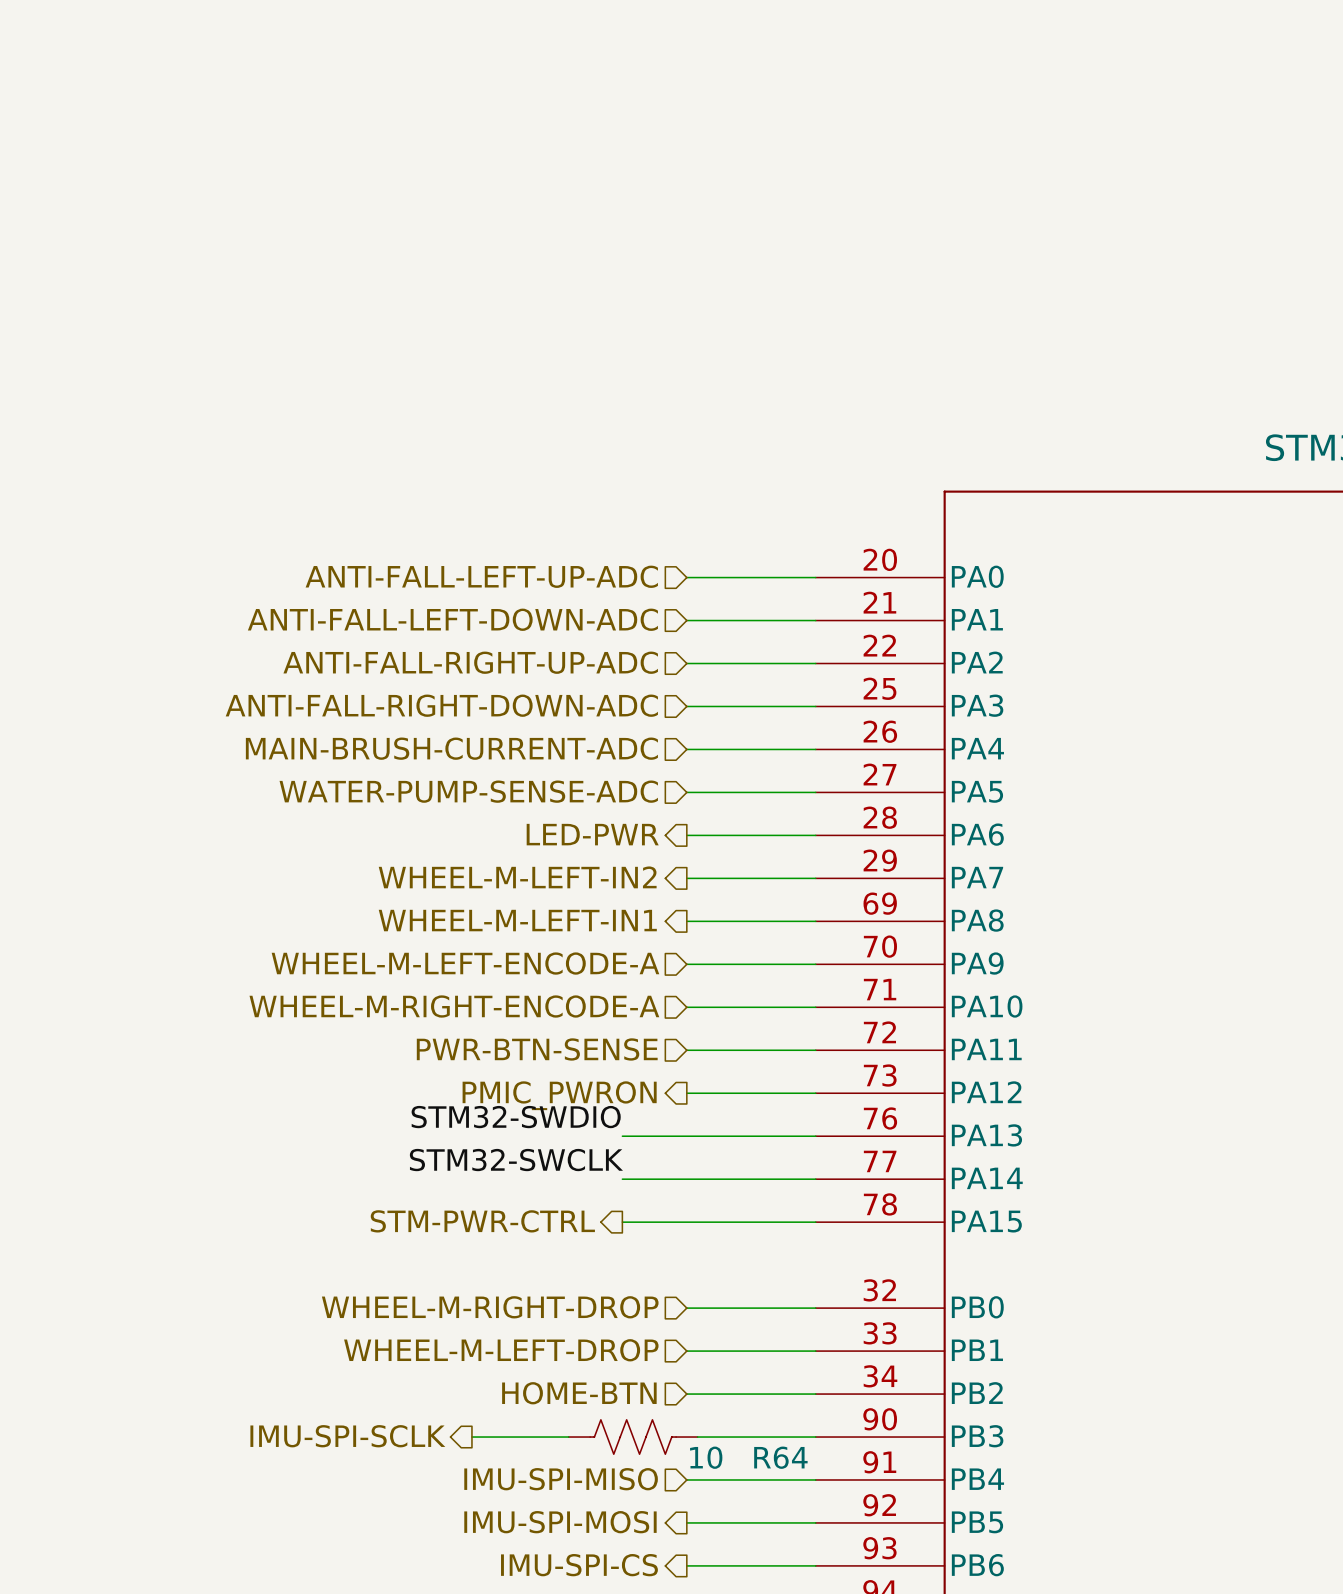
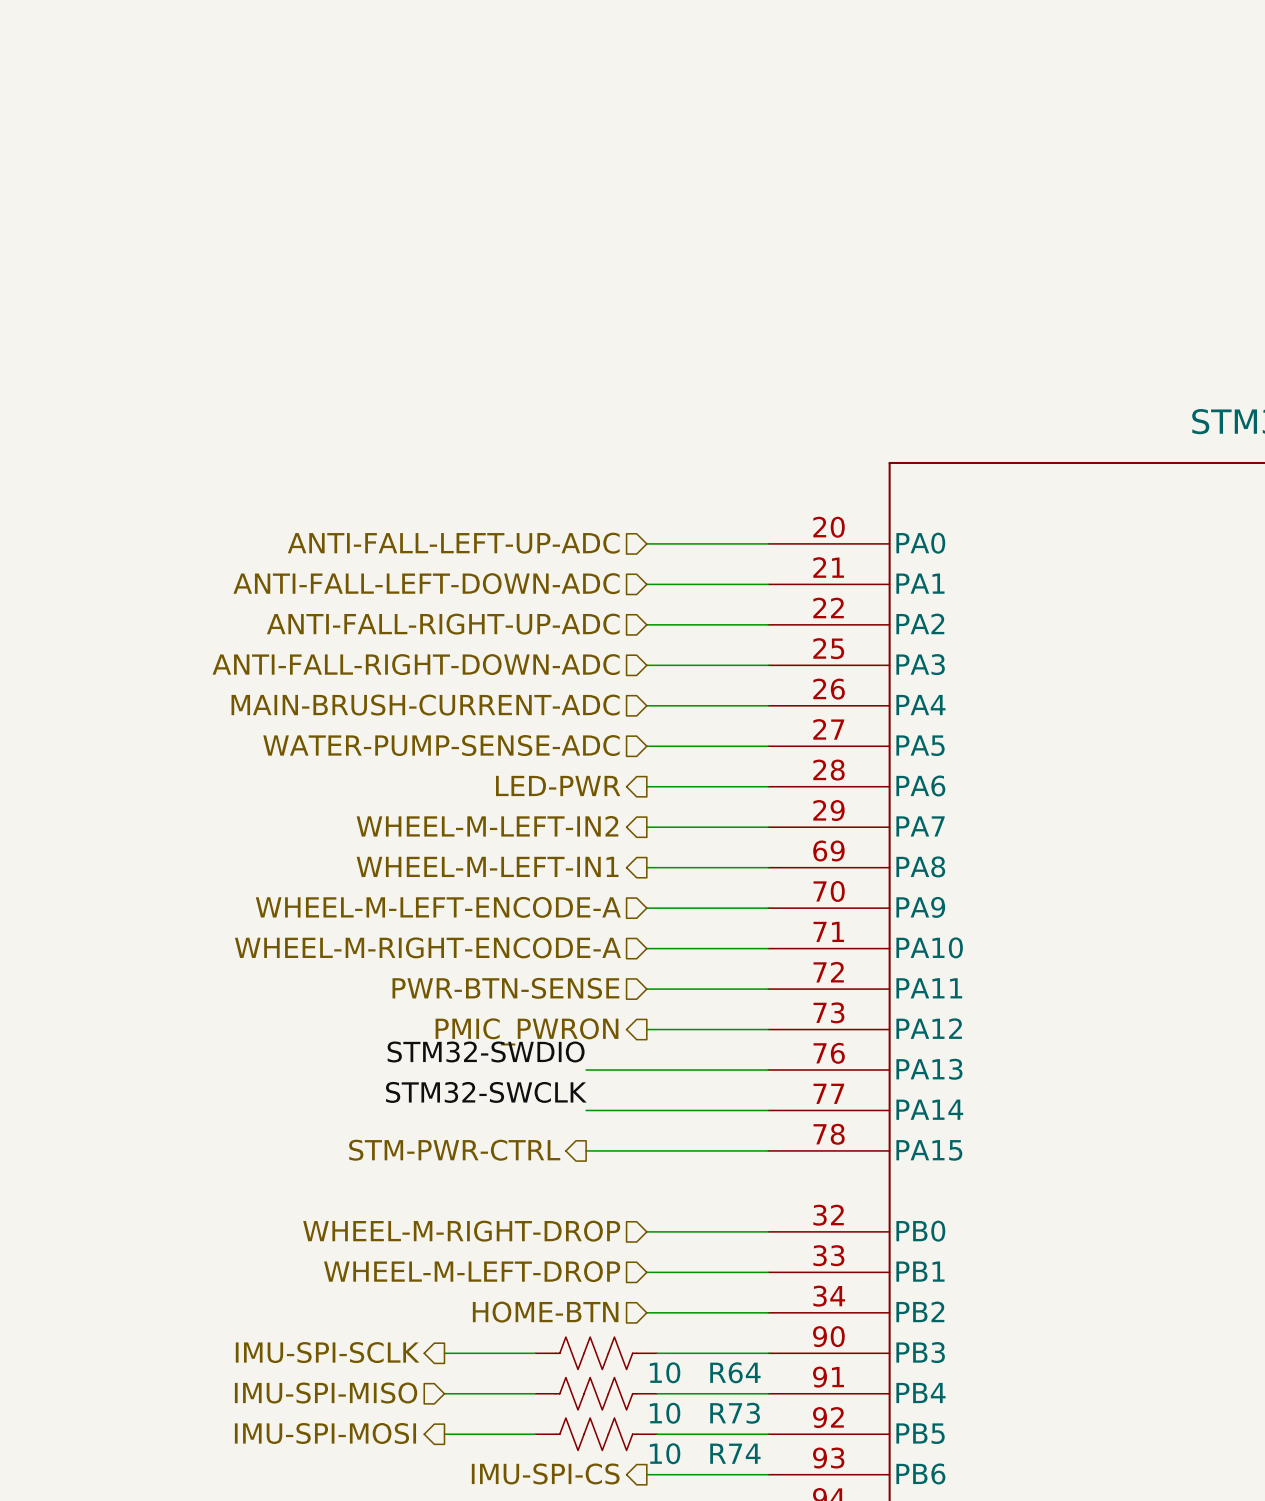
wire: none -> (444, 1393) (535, 1393)
hierarchical label position: IMU-SPI-MISO (561, 1479) -> IMU-SPI-MISO (326, 1393)
R73: none -> 10 (596, 1393)
wire: none -> (444, 1434) (535, 1434)
hierarchical label position: IMU-SPI-MOSI (560, 1522) -> IMU-SPI-MOSI (325, 1433)
R74: none -> 10 (596, 1434)

